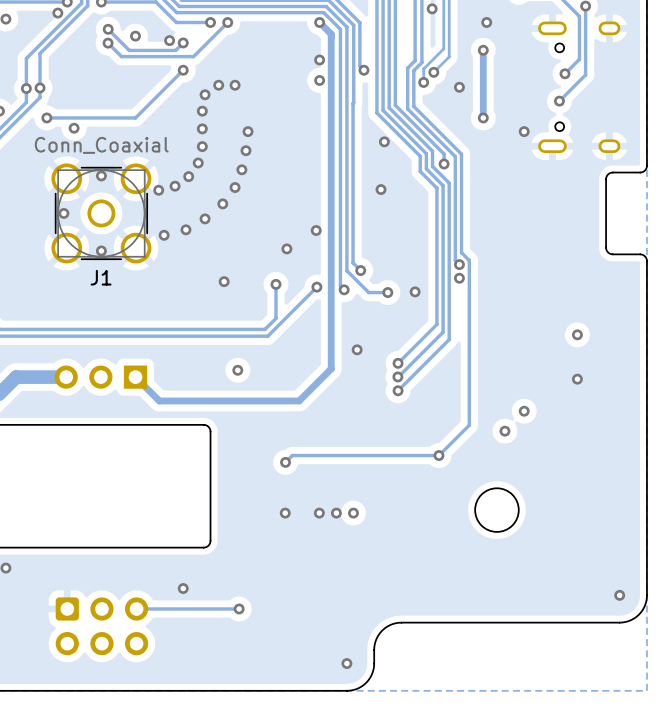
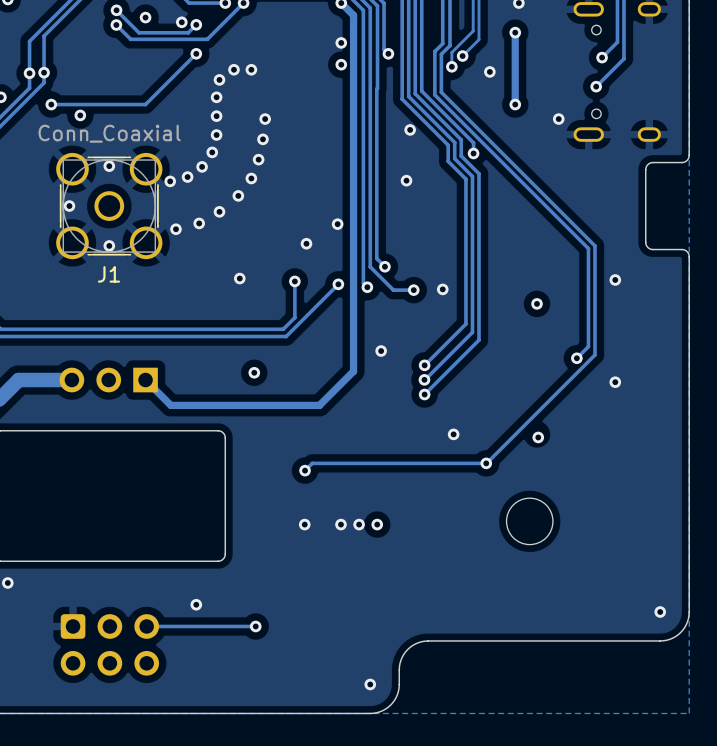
track: (461, 154) (461, 252) (469, 260) (469, 425) (438, 455) -> (492, 142) (594, 245) (594, 355) (486, 463) (468, 463)
track: (455, 156) (455, 260) (459, 264) -> (485, 145) (588, 248) (588, 346) (576, 358)
via: (459, 264) -> none
via: (459, 278) -> none
via: none -> (615, 279)
via: none -> (536, 303)
via: (577, 334) -> none
via: none -> (576, 358)
via: (524, 411) -> none
via: none -> (453, 434)
via: (438, 455) -> none
via: none -> (486, 463)

